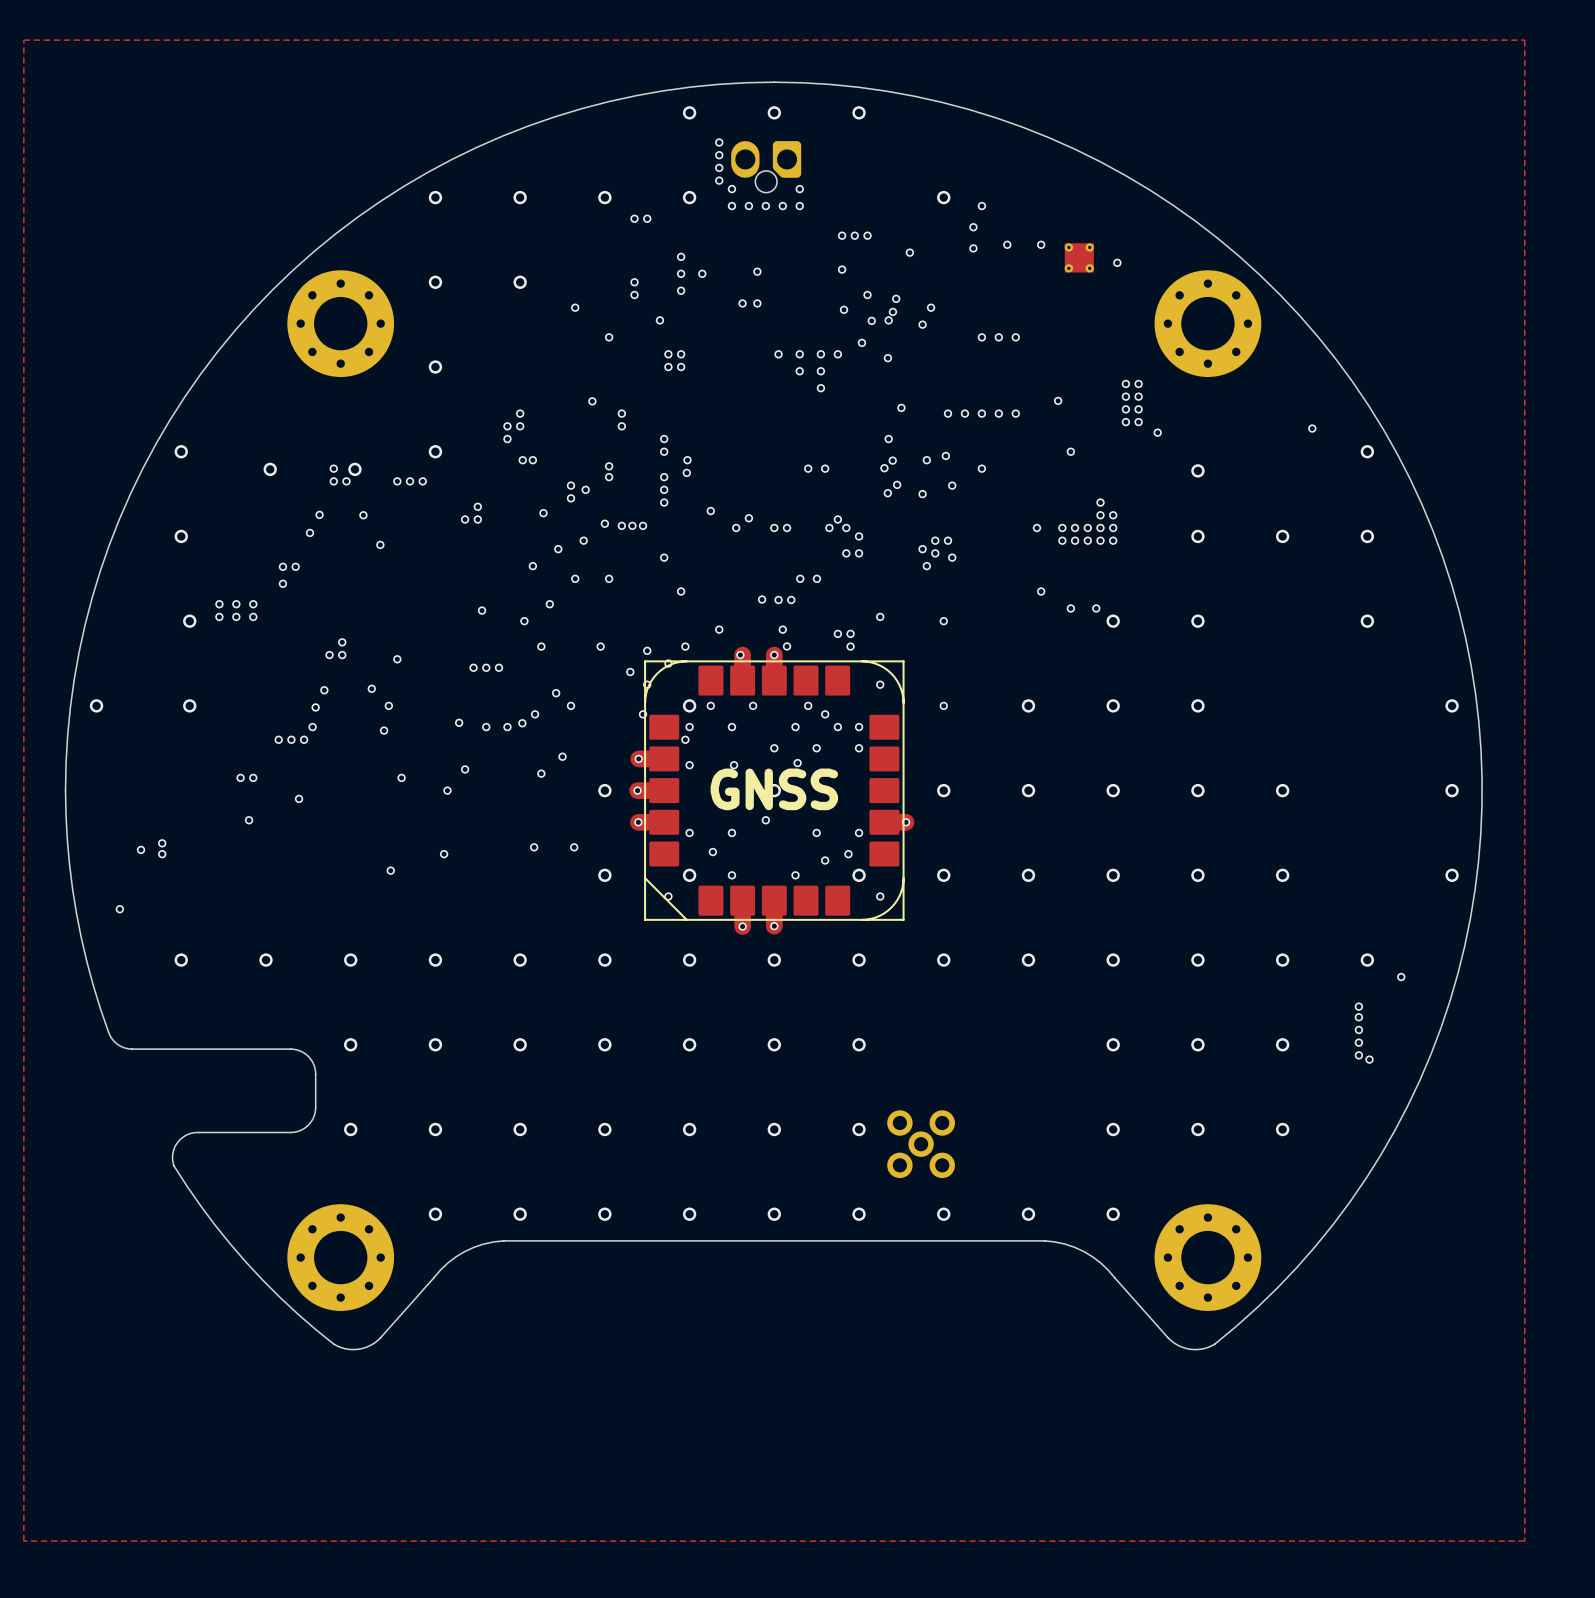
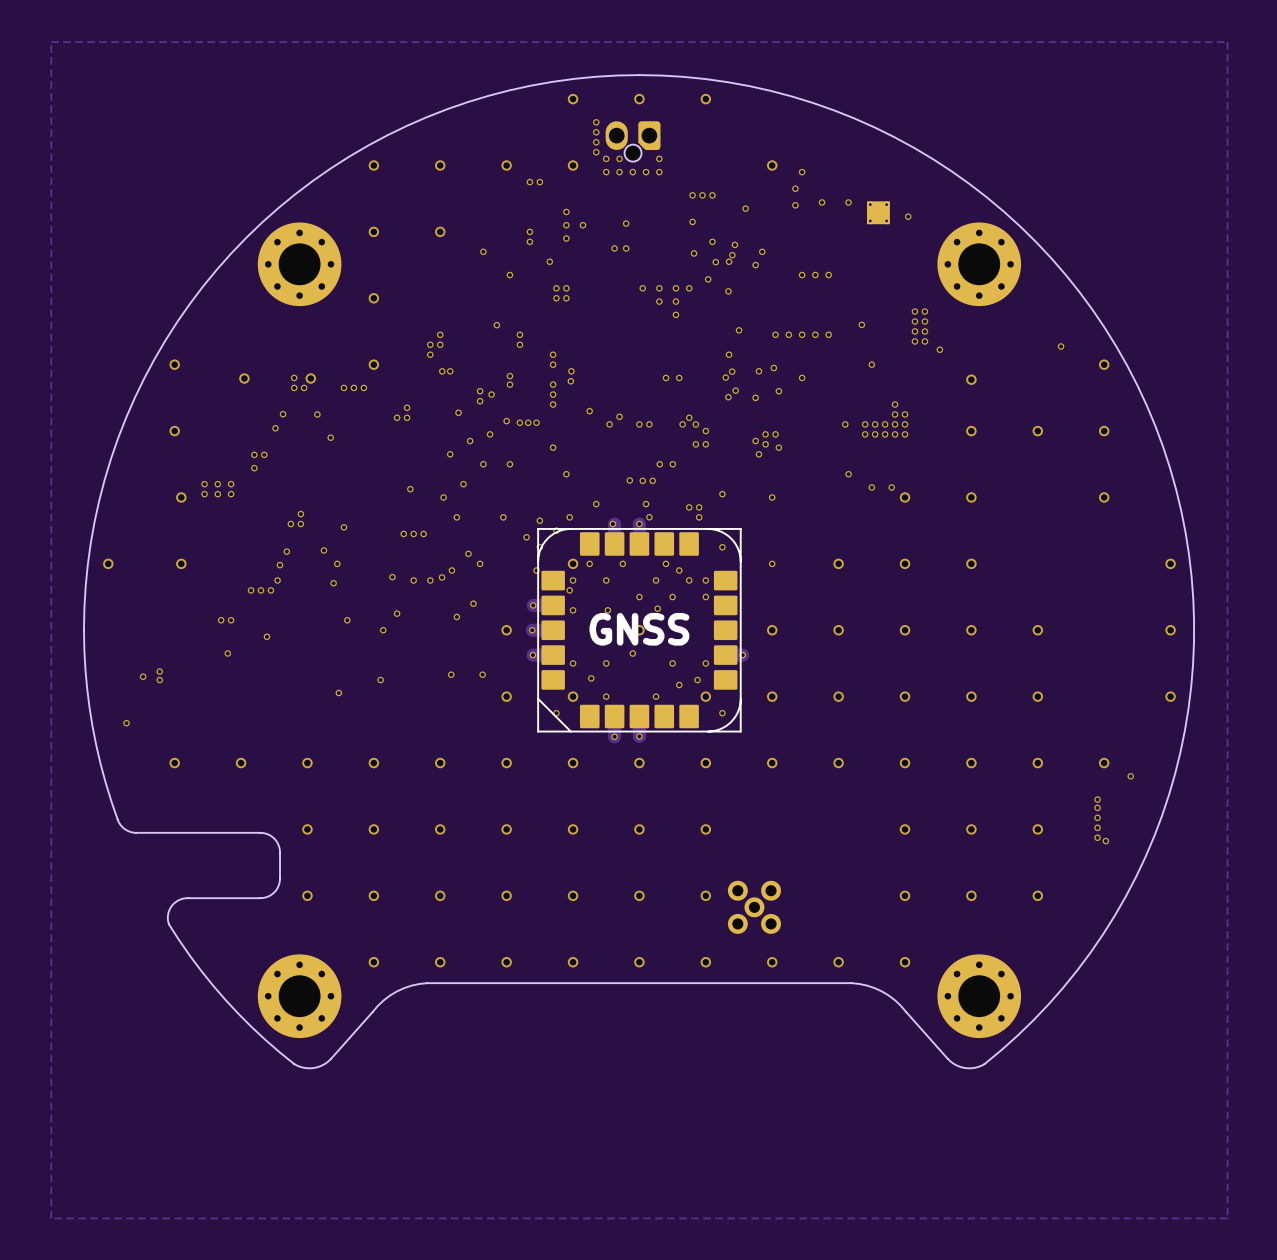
via: none -> (619, 158)

